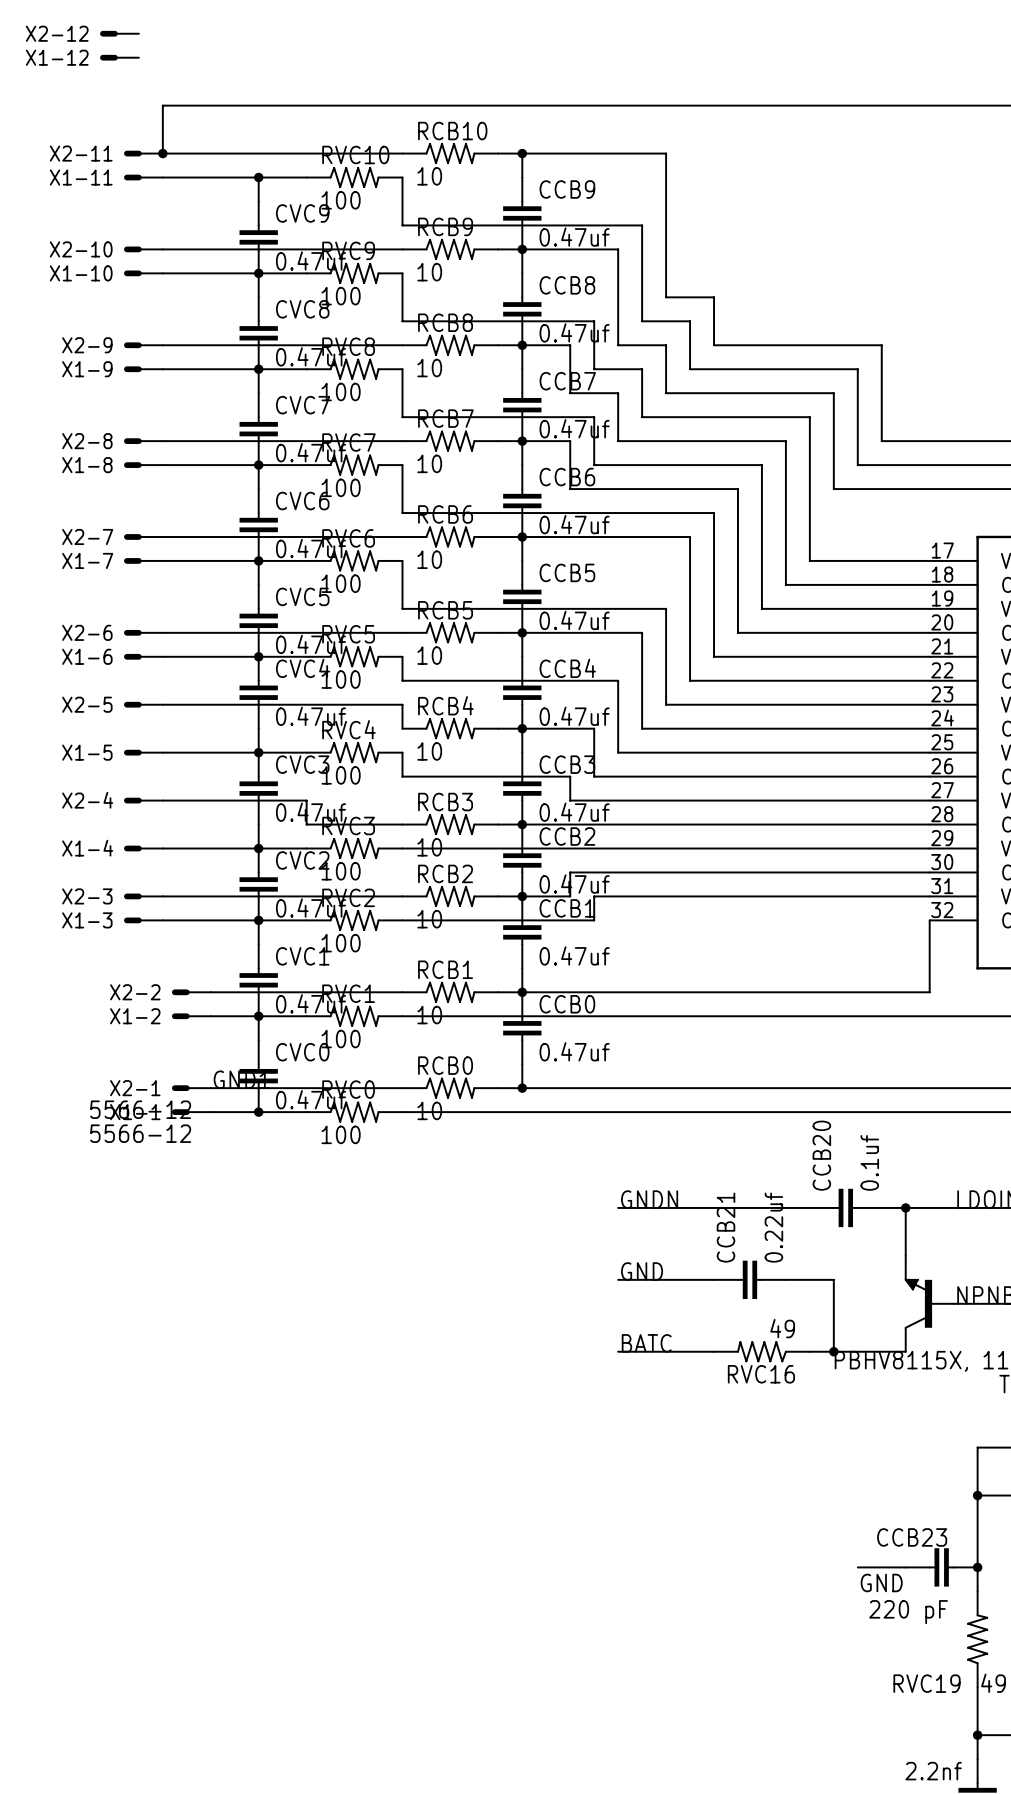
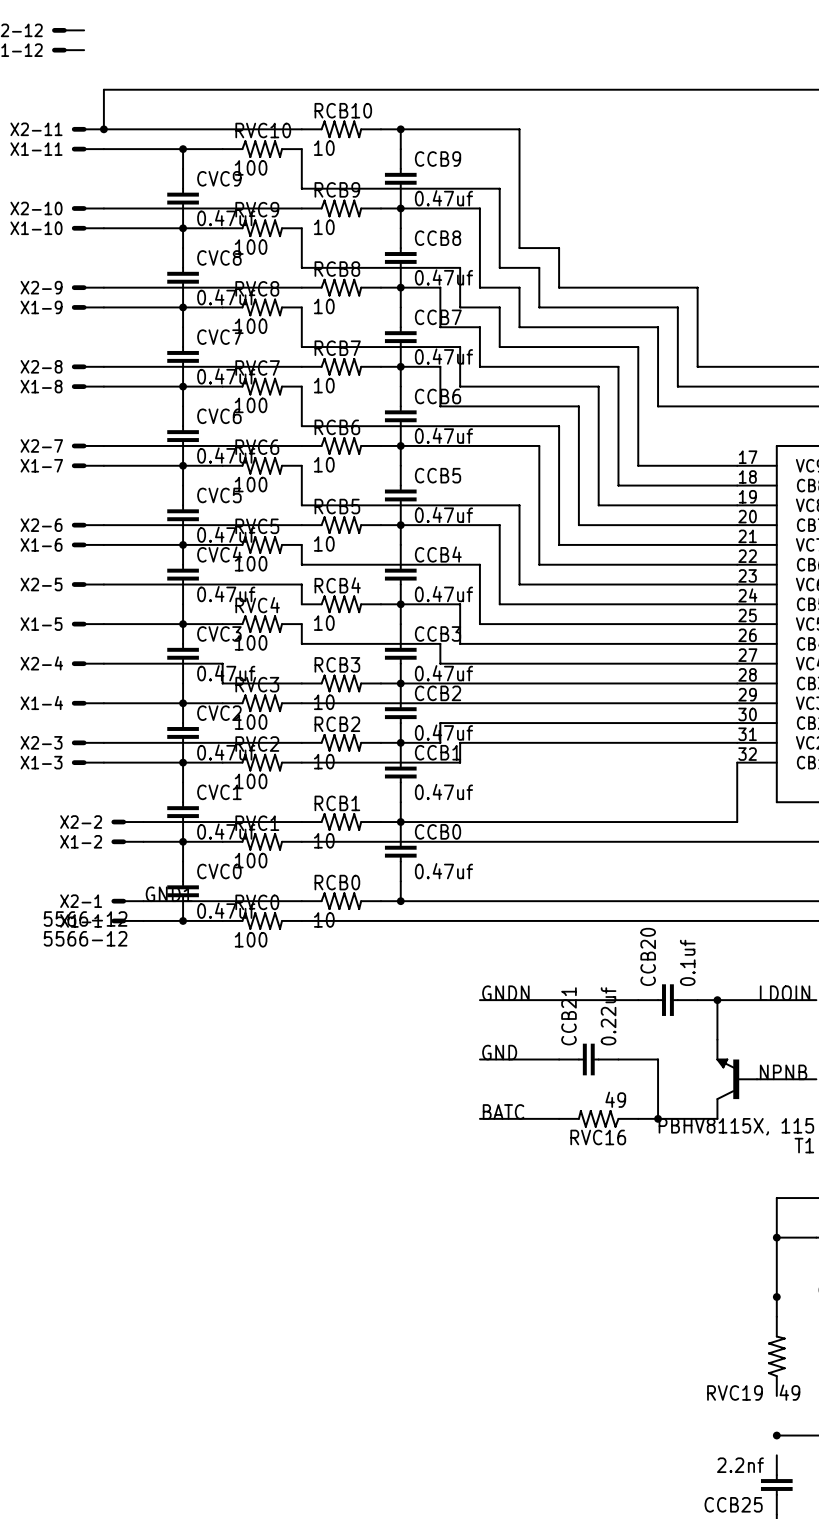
wire: (857, 1567) (905, 1567) -> none
CCB23: 220 pF (941, 1567) -> none
label: GND (881, 1582) -> none
wire: (977, 1687) (977, 1759) -> none

